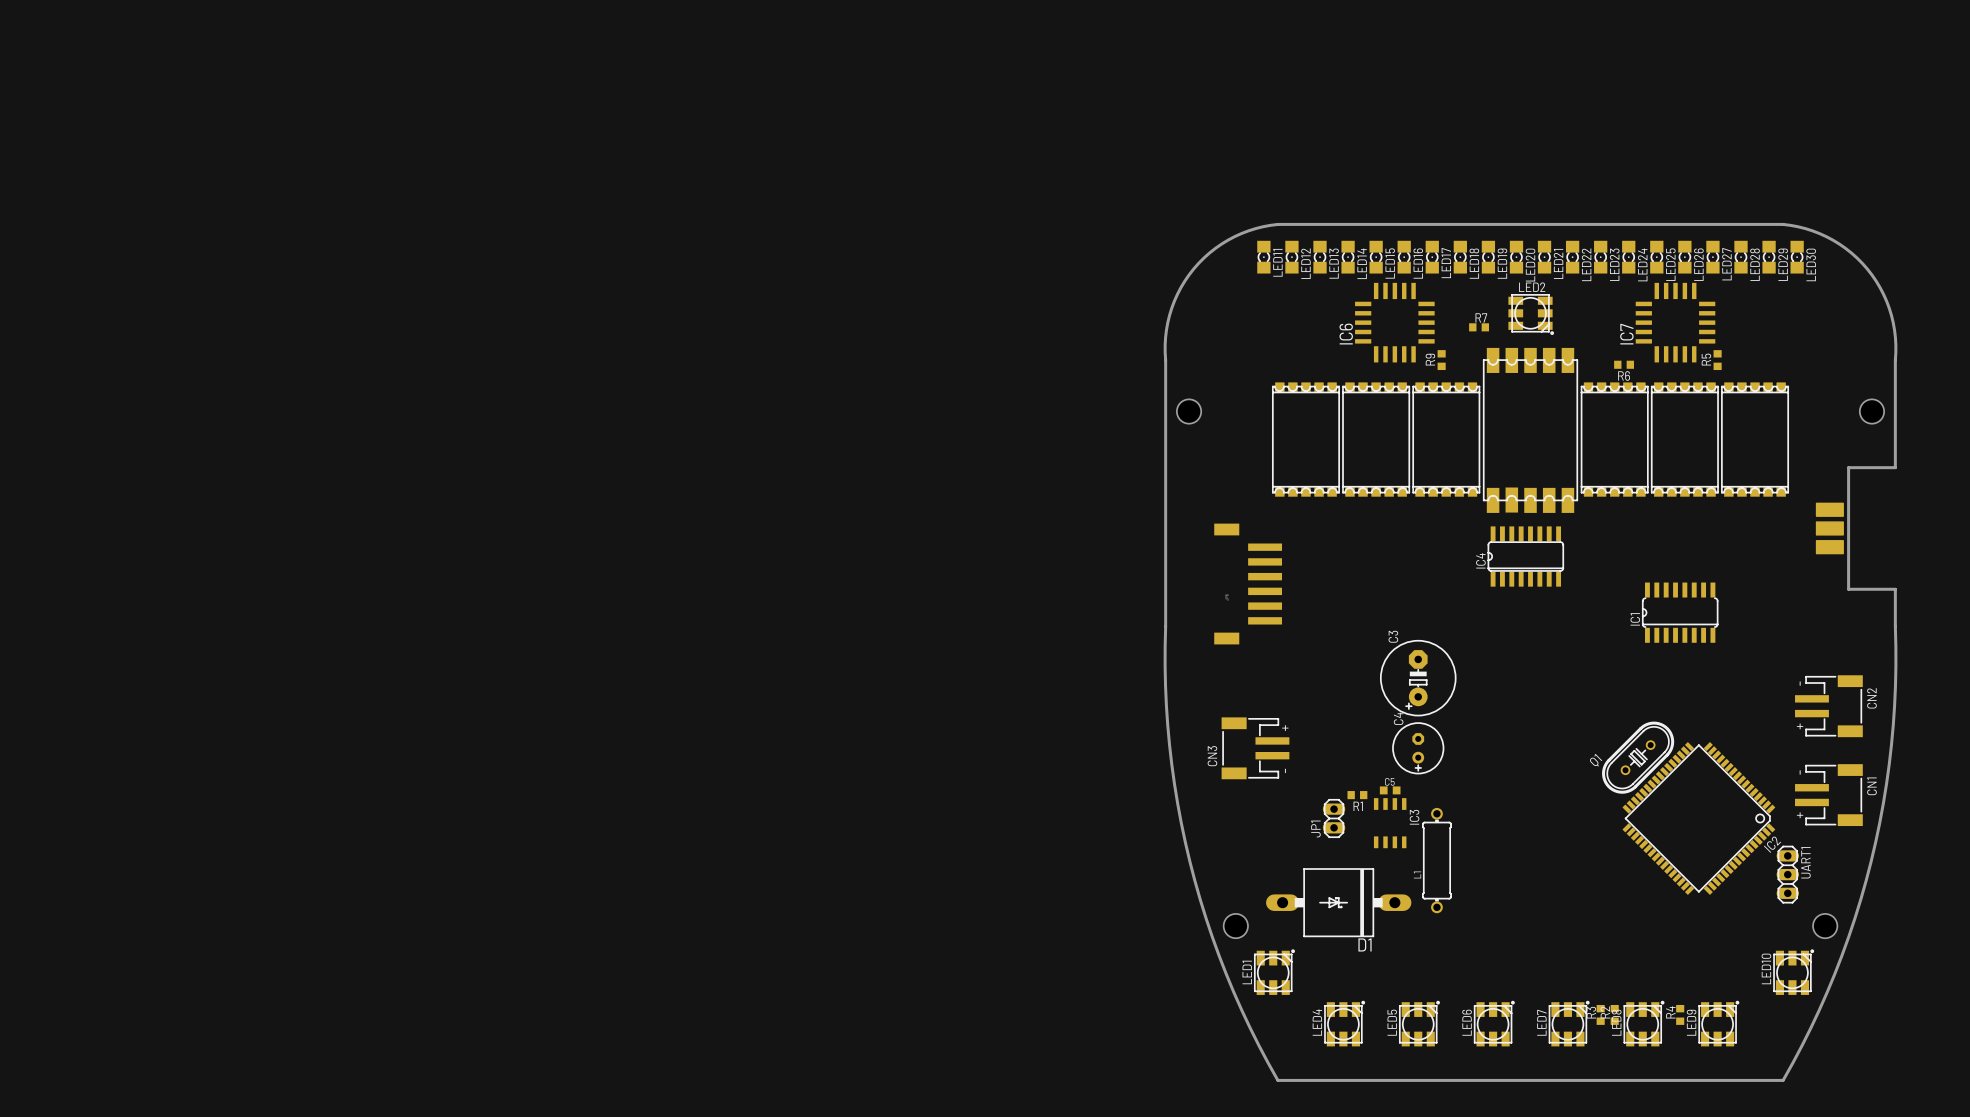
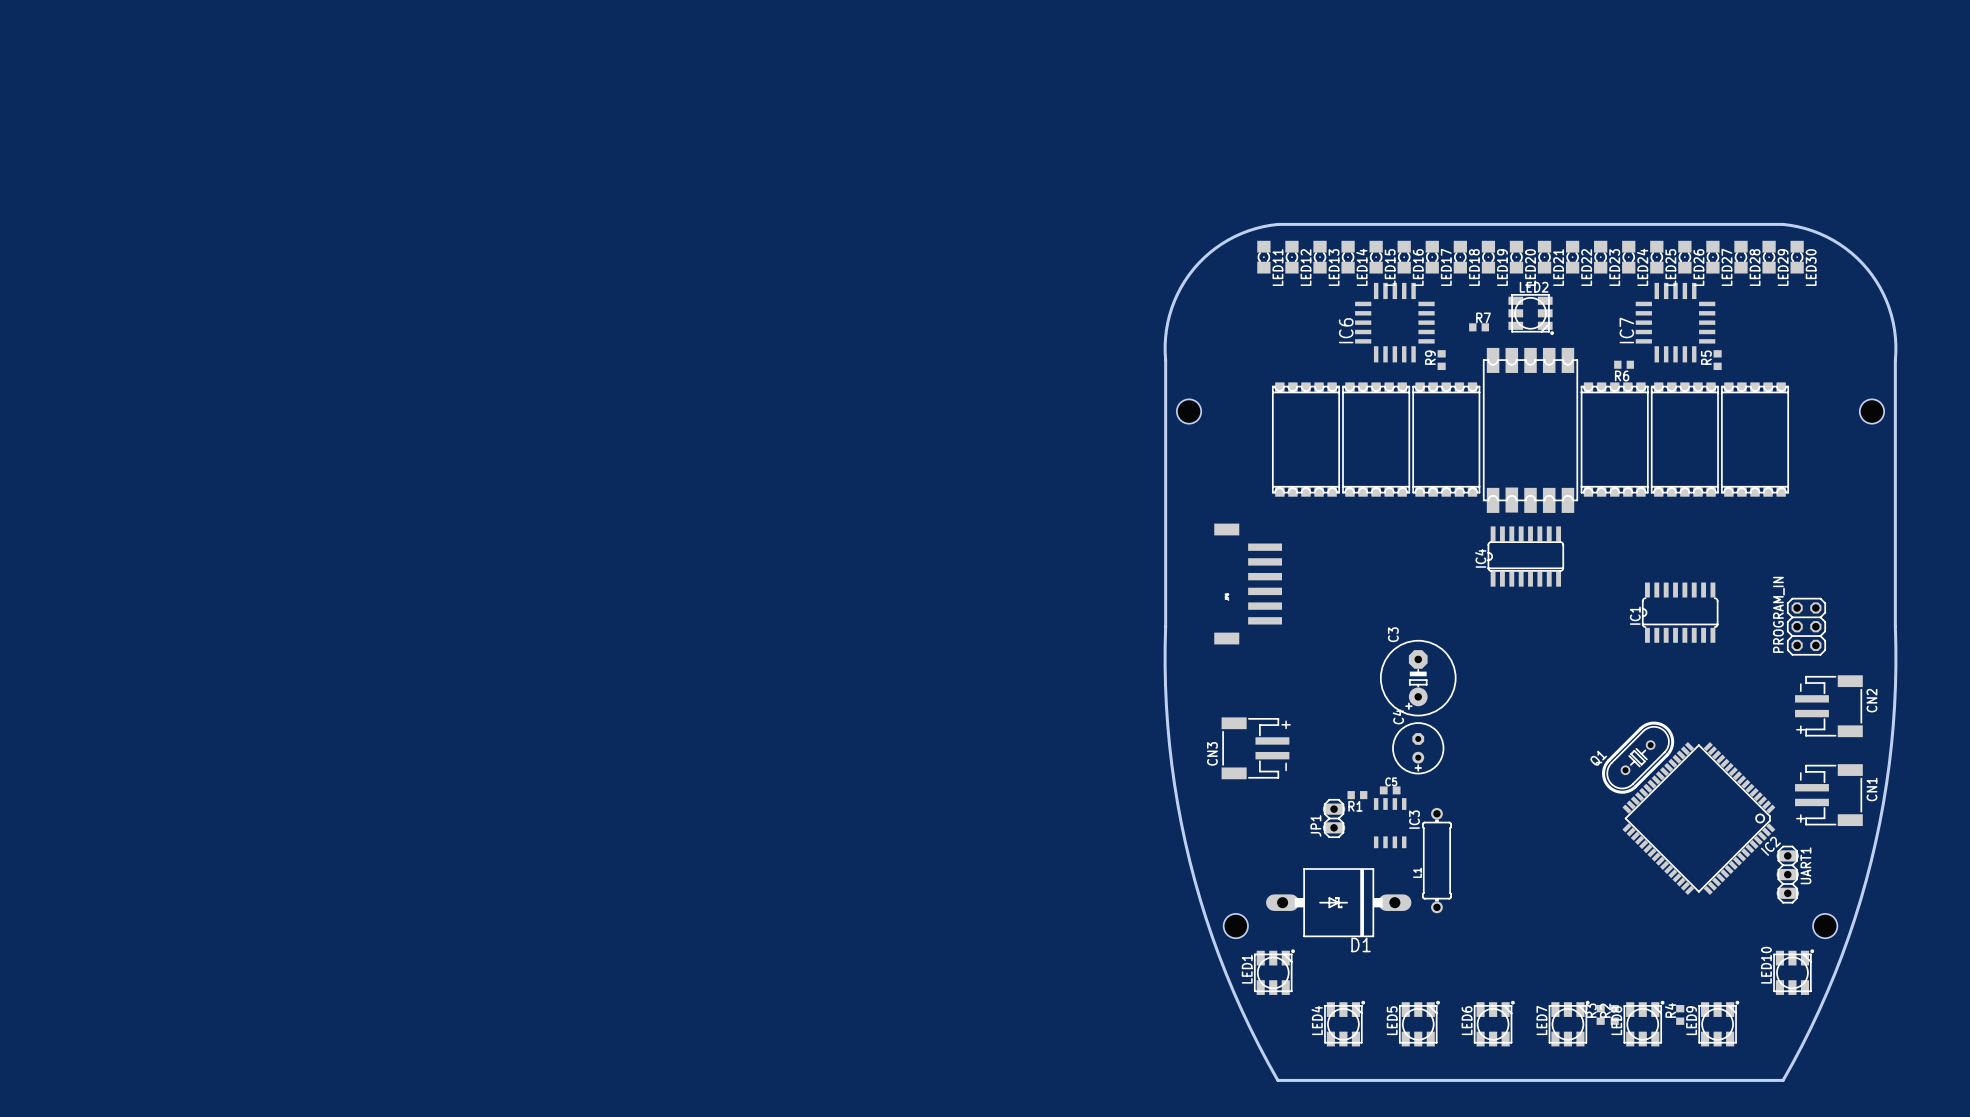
board edge: (1895, 467) (1848, 467) (1848, 589) (1895, 589) -> (1895, 467) (1895, 589)
part: (1829, 528) -> none
PROGRAM_IN: none -> (1806, 626)

